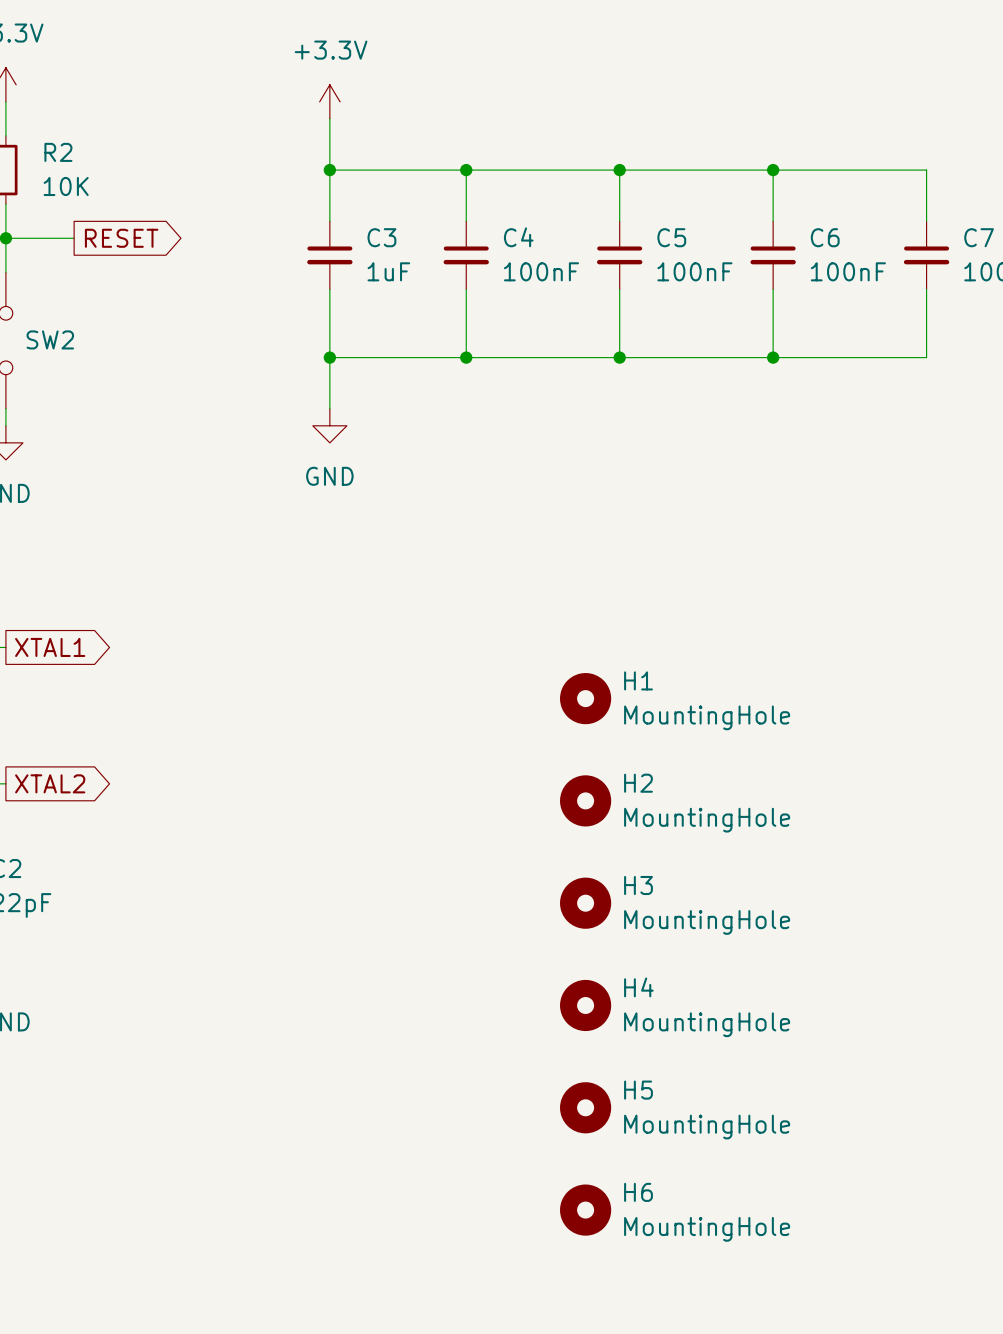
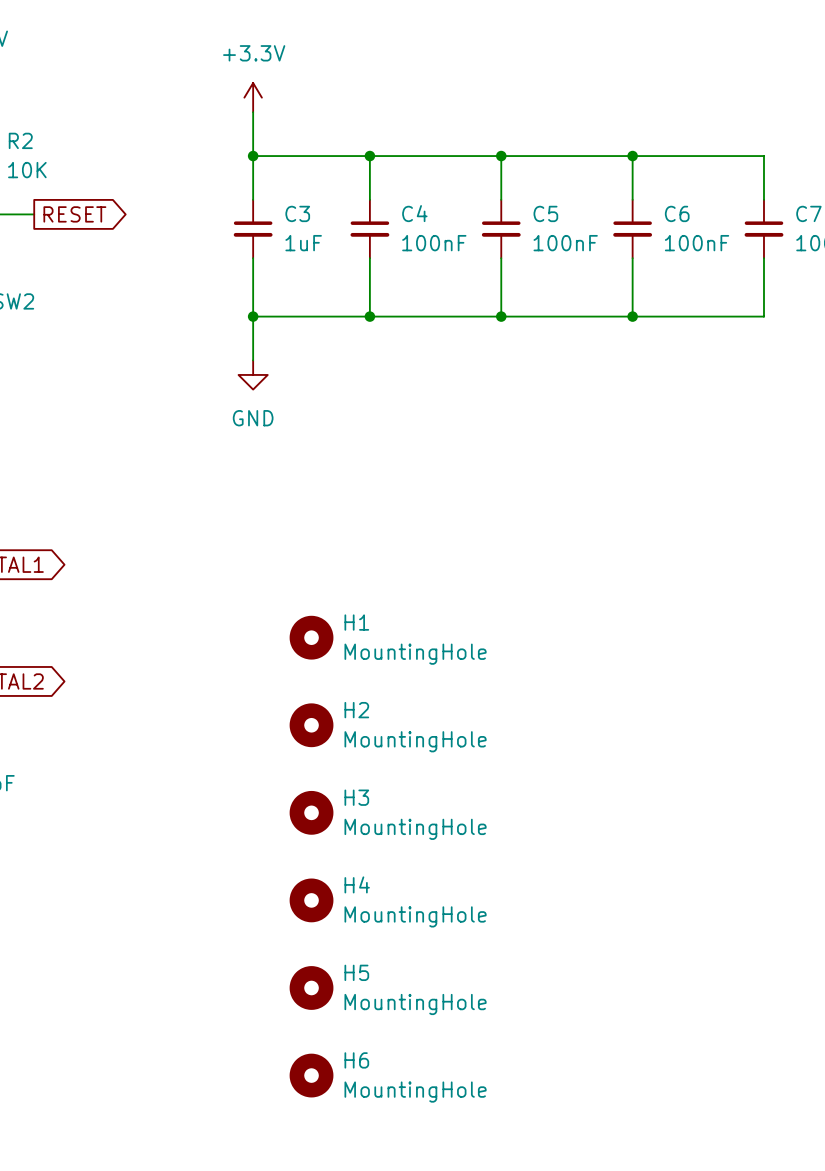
H1 position: (585, 698) -> (311, 637)
H2 position: (585, 800) -> (311, 725)
H3 position: (585, 903) -> (311, 812)
H4 position: (585, 1005) -> (311, 900)
H5 position: (585, 1107) -> (311, 987)
H6 position: (585, 1210) -> (311, 1075)

